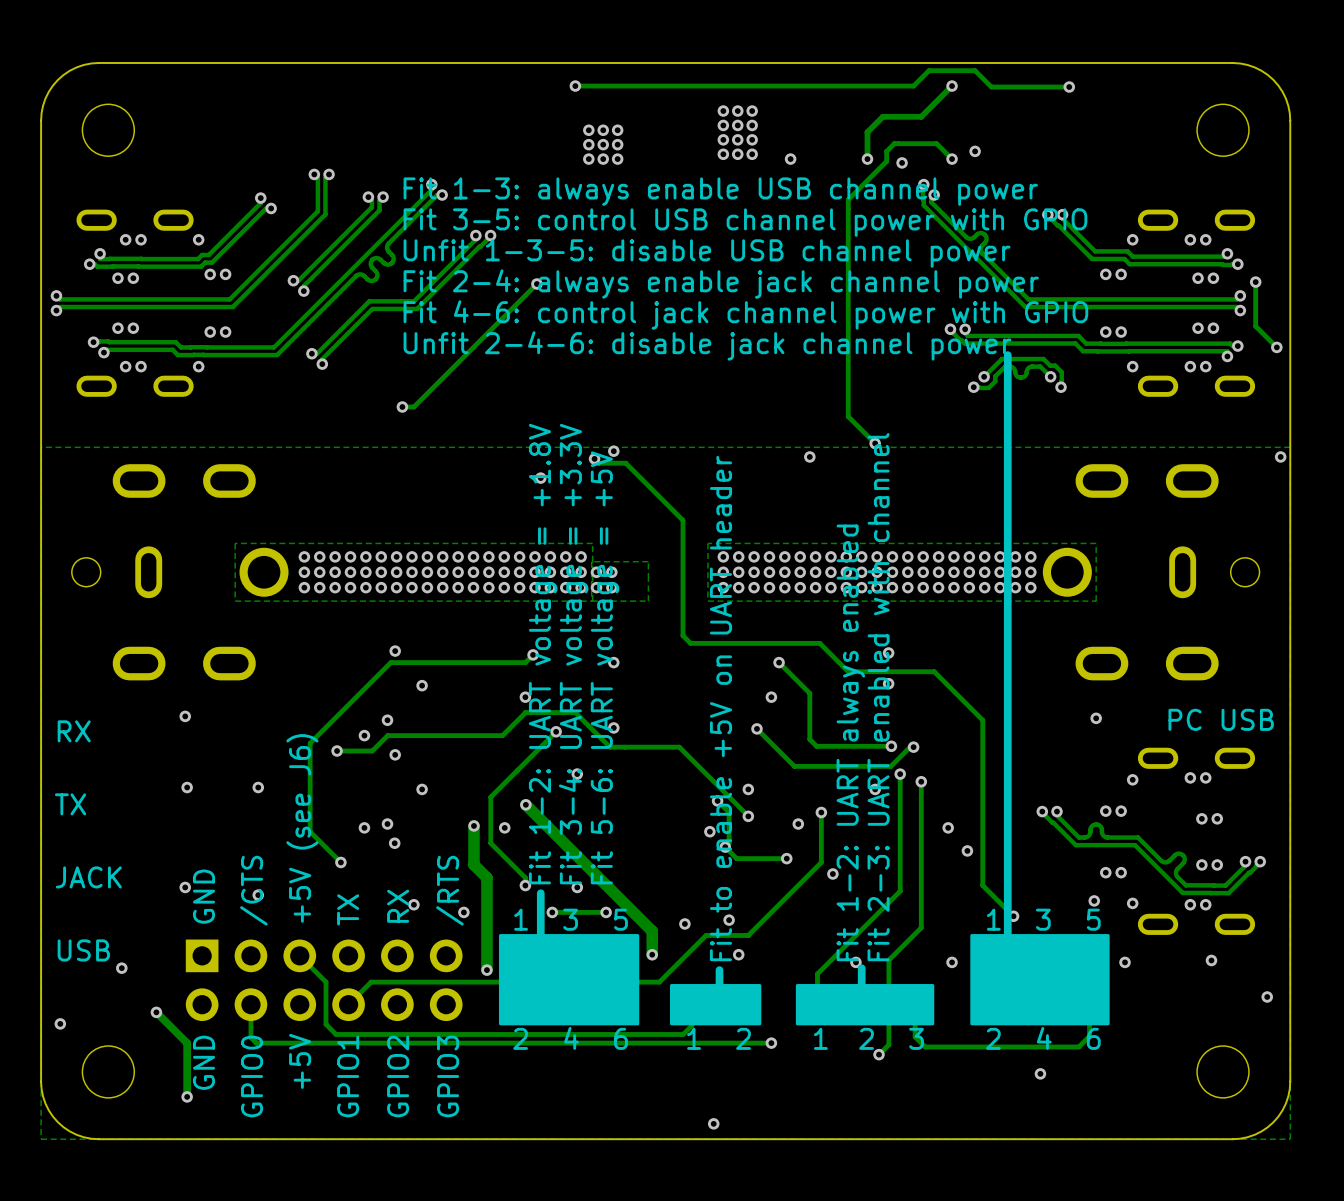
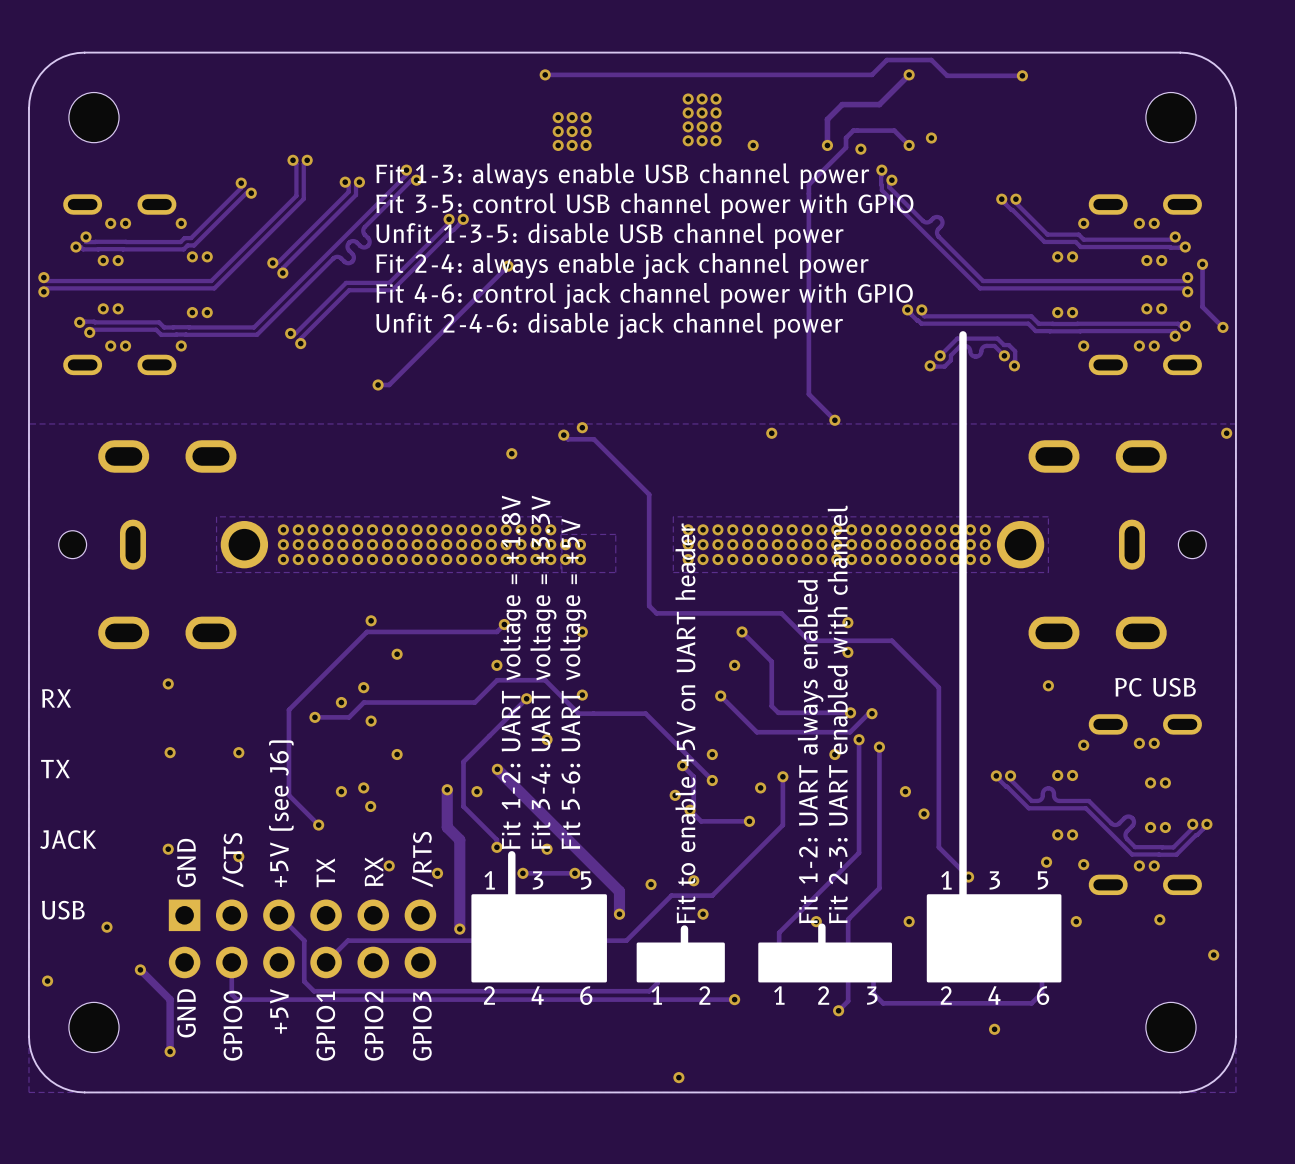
via: (832, 873) -> none

